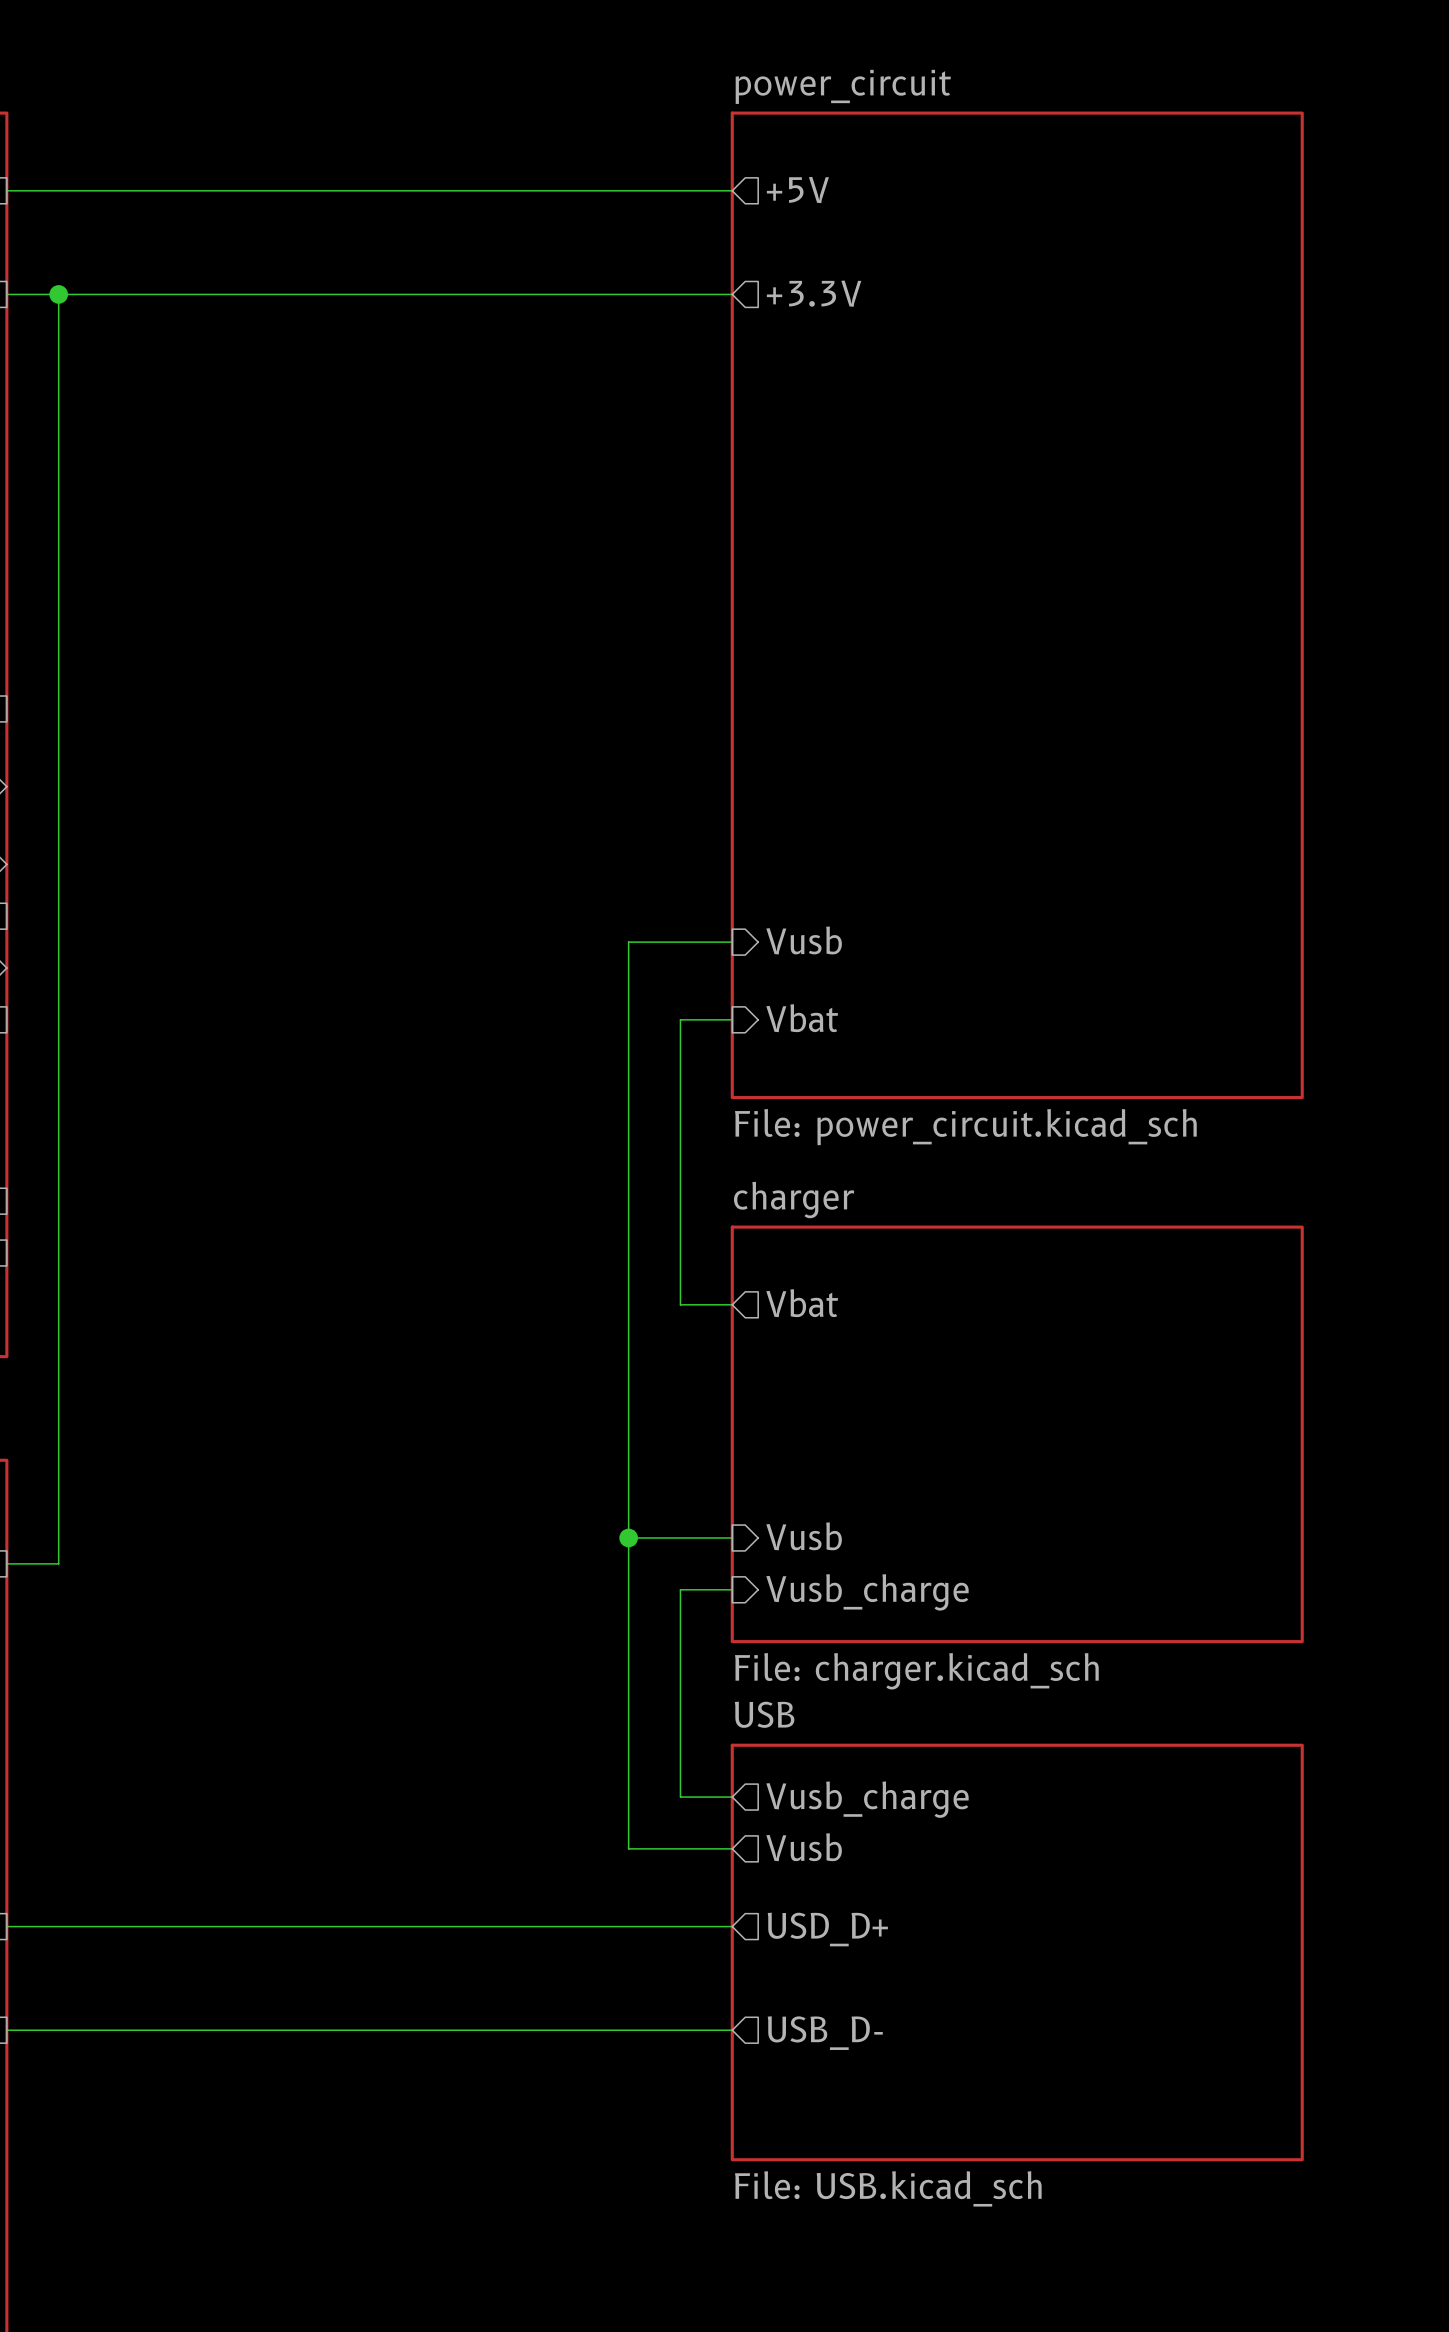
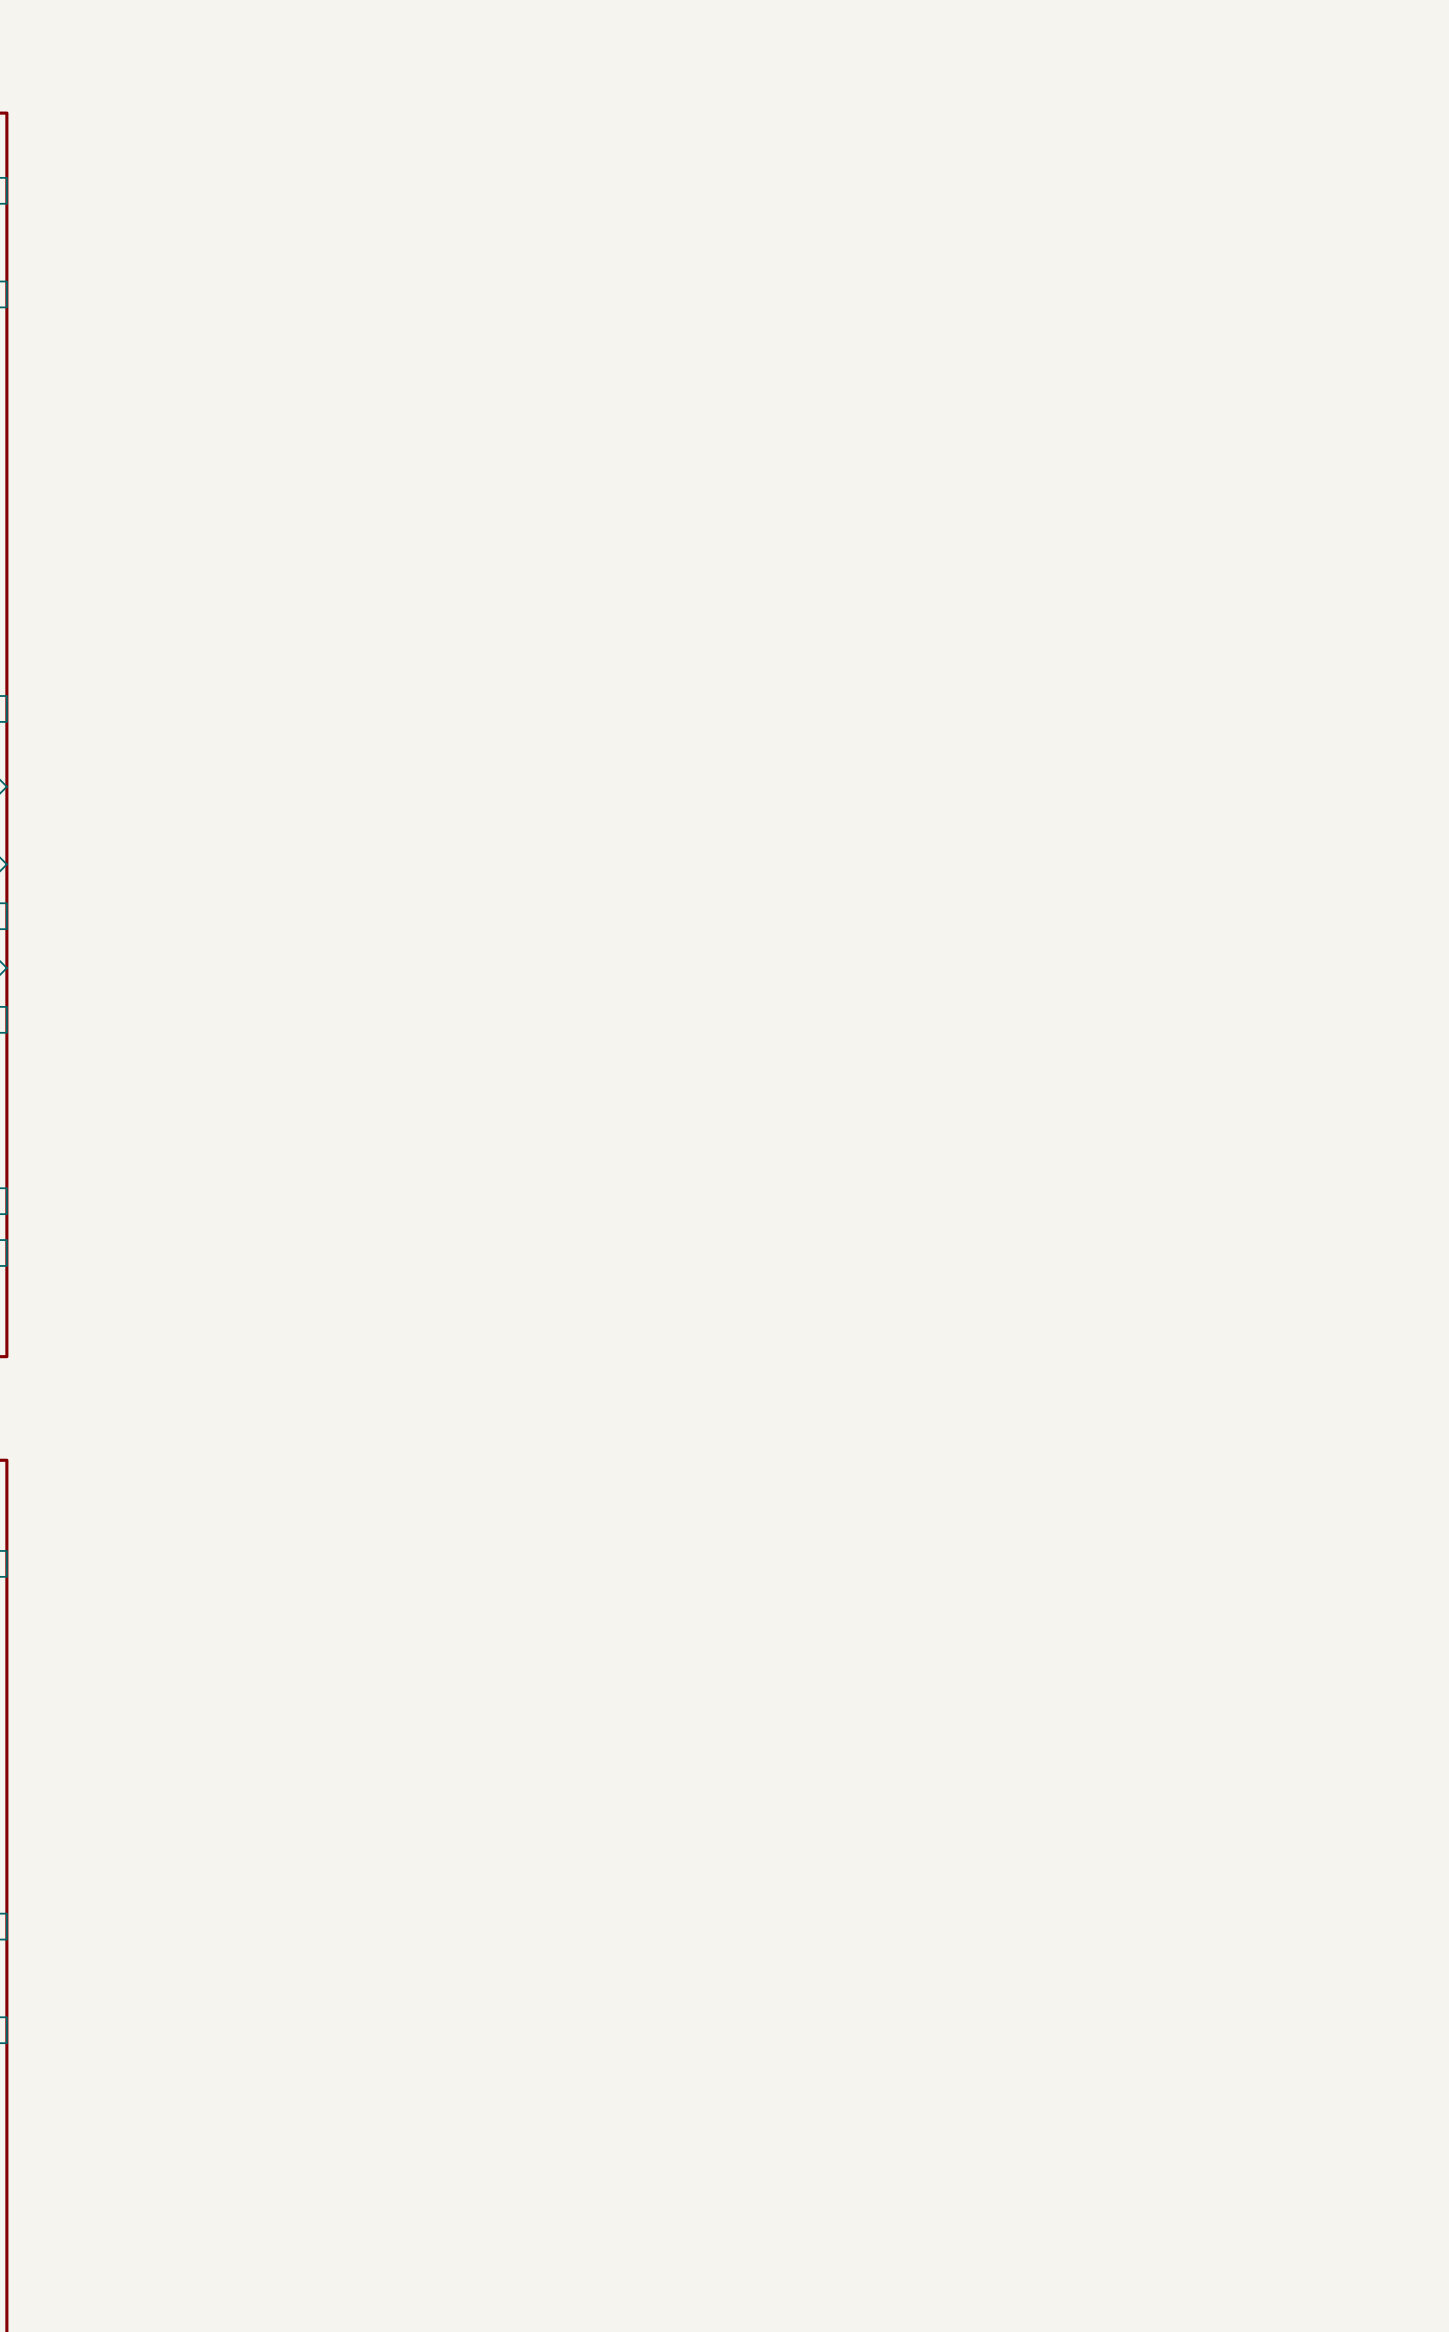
wire: (6, 190) (732, 190) -> none
sheet pin: +5V (797, 190) -> none
sheet pin: +3.3V (814, 293) -> none
wire: (6, 294) (732, 294) -> none
wire: (58, 294) (58, 1563) (6, 1563) -> none
junction: (58, 294) -> none
sheet power_circuit: File: power_circuit.kicad_sch (1017, 605) -> none
sheet pin: Vusb (804, 940) -> none
wire: (732, 942) (628, 942) (628, 1848) (732, 1848) -> none
sheet pin: Vbat (802, 1018) -> none
wire: (732, 1019) (680, 1019) (680, 1304) (732, 1304) -> none
sheet pin: Vbat (802, 1303) -> none
sheet charger: File: charger.kicad_sch (1017, 1434) -> none
sheet pin: Vusb (804, 1536) -> none
wire: (628, 1537) (732, 1537) -> none
junction: (628, 1537) -> none
wire: (732, 1589) (680, 1589) (680, 1797) (732, 1797) -> none
sheet pin: Vusb_charge (867, 1592) -> none
sheet pin: Vusb_charge (867, 1799) -> none
sheet pin: Vusb (804, 1847) -> none
wire: (6, 1926) (732, 1926) -> none
sheet pin: USD_D+ (827, 1929) -> none
sheet USB: File: USB.kicad_sch (1017, 1952) -> none
wire: (6, 2030) (732, 2030) -> none
sheet pin: USB_D- (825, 2033) -> none

